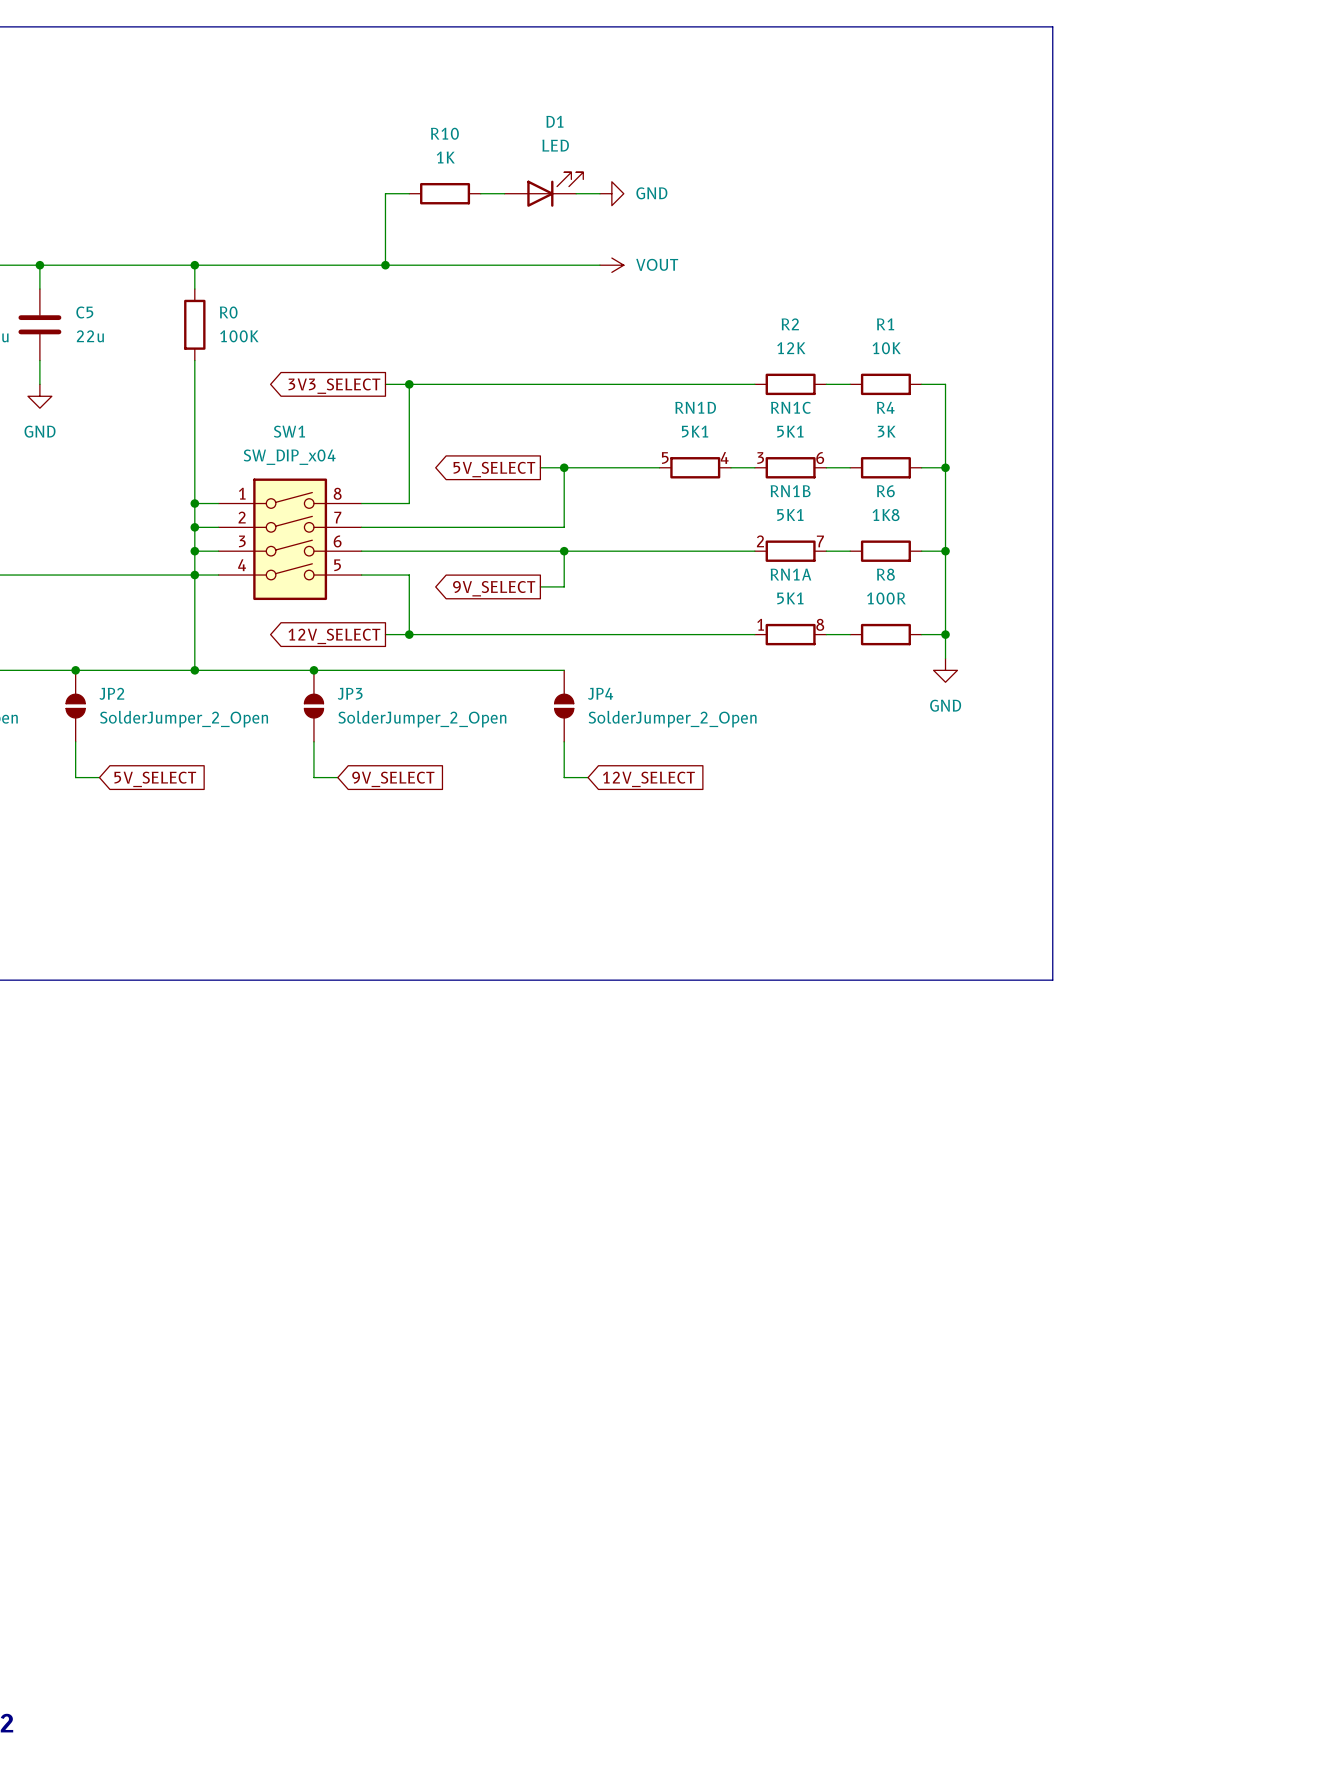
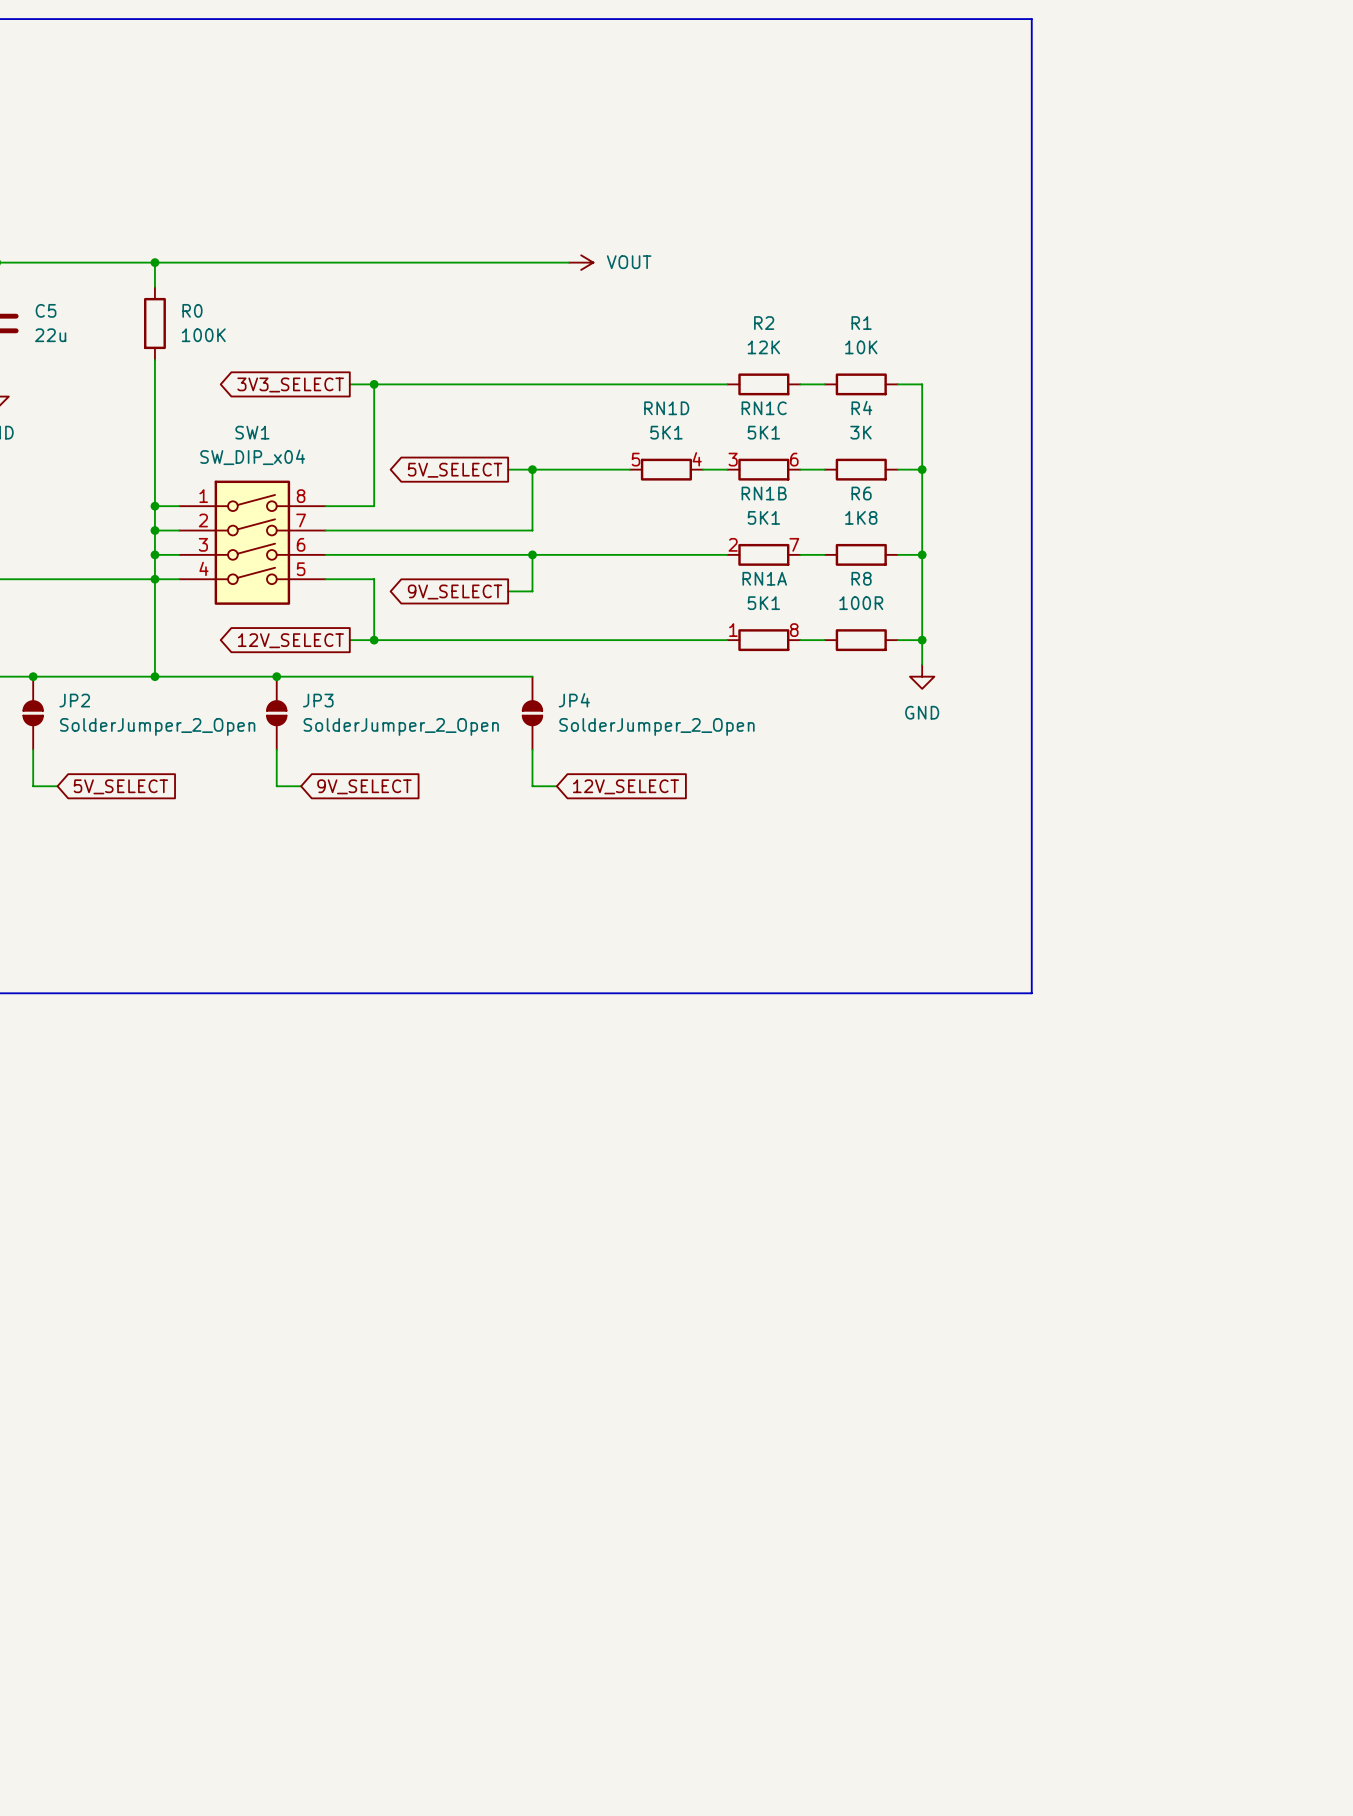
D1: LED (543, 189) -> none
wire: (409, 193) (385, 193) (385, 265) -> none
R10: 1K (445, 193) -> none
wire: (480, 193) (504, 193) -> none
wire: (576, 193) (599, 193) -> none
power symbol: GND (611, 193) -> none
junction: (385, 265) -> none

